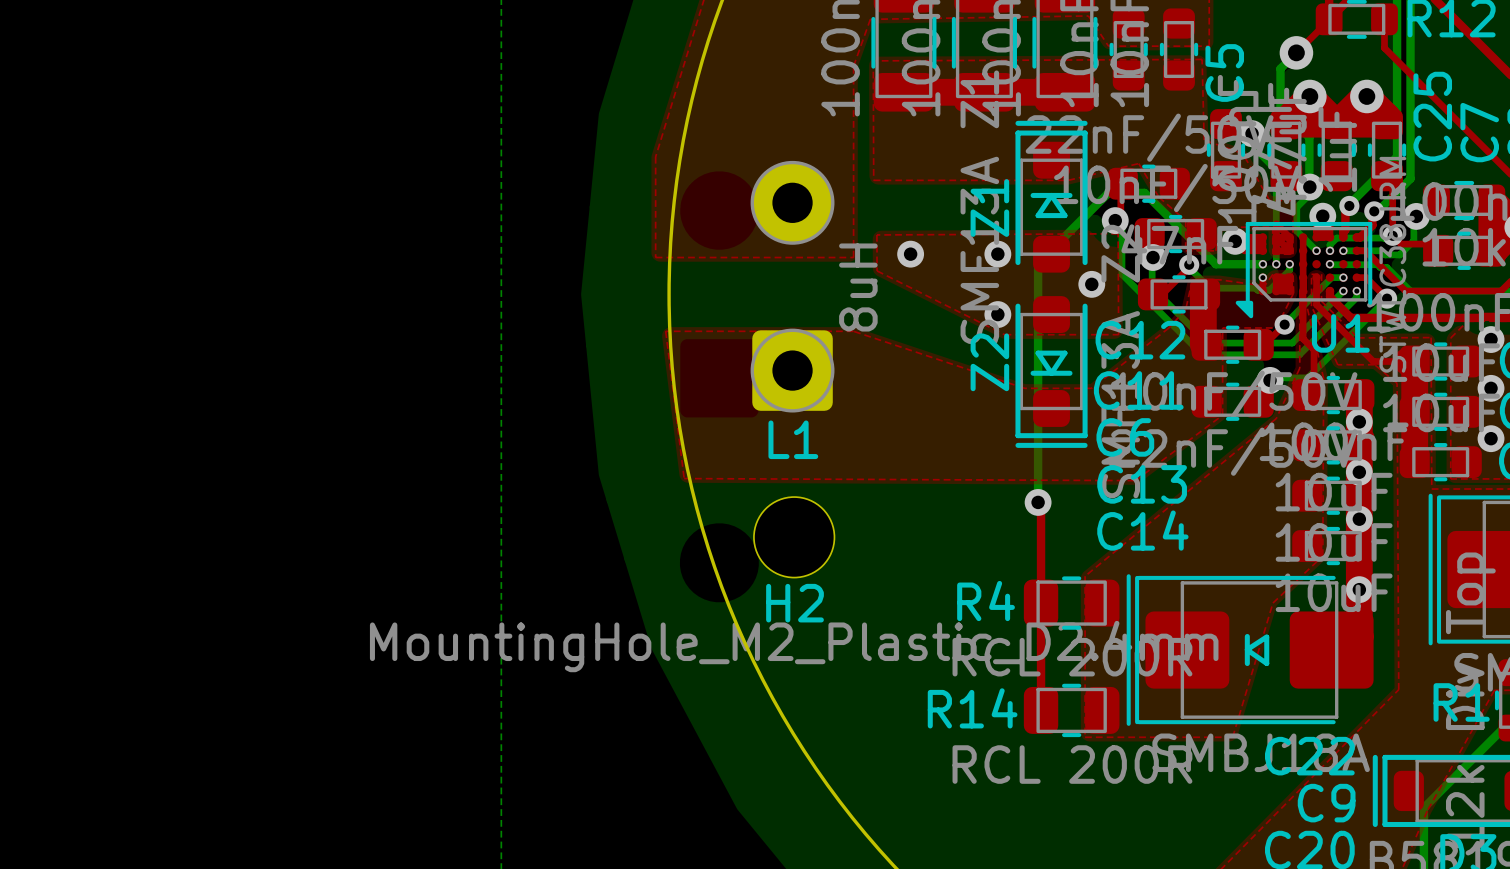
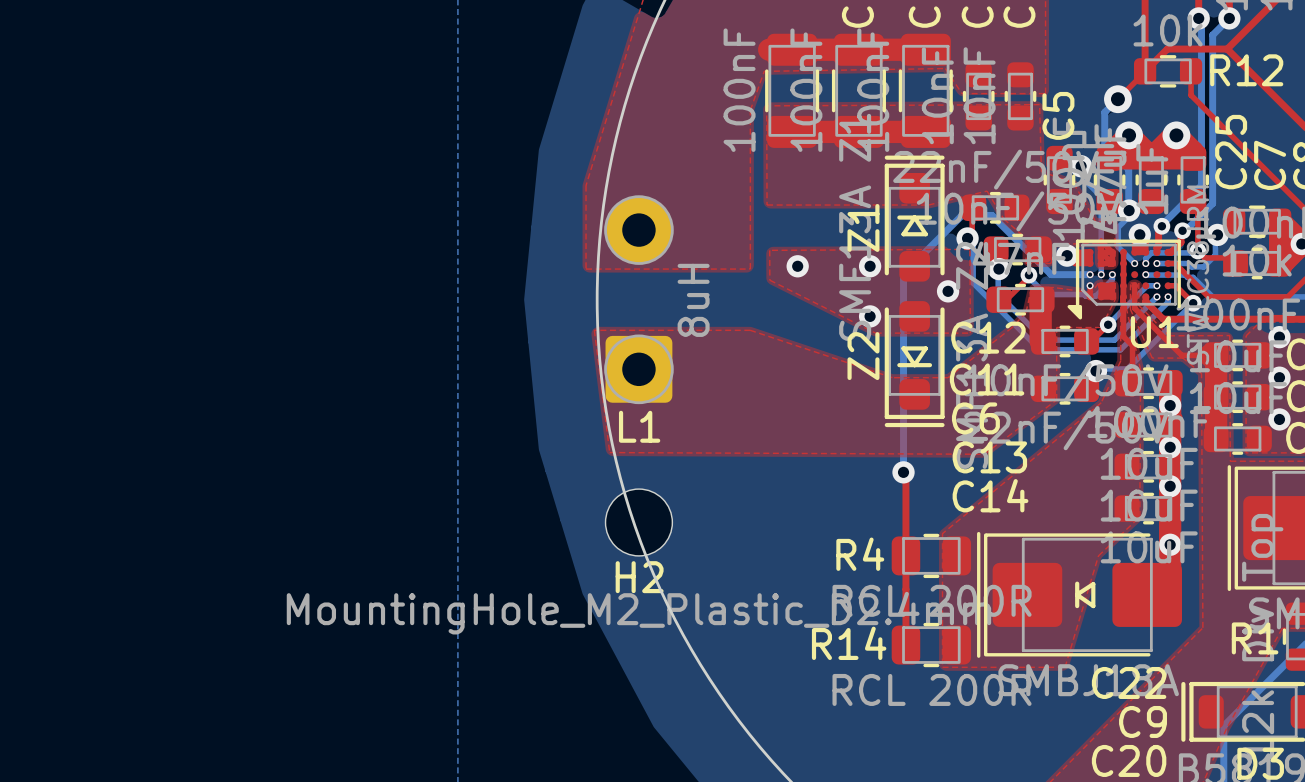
L1 position: (792, 286) -> (638, 299)
H2 position: (794, 537) -> (638, 522)

